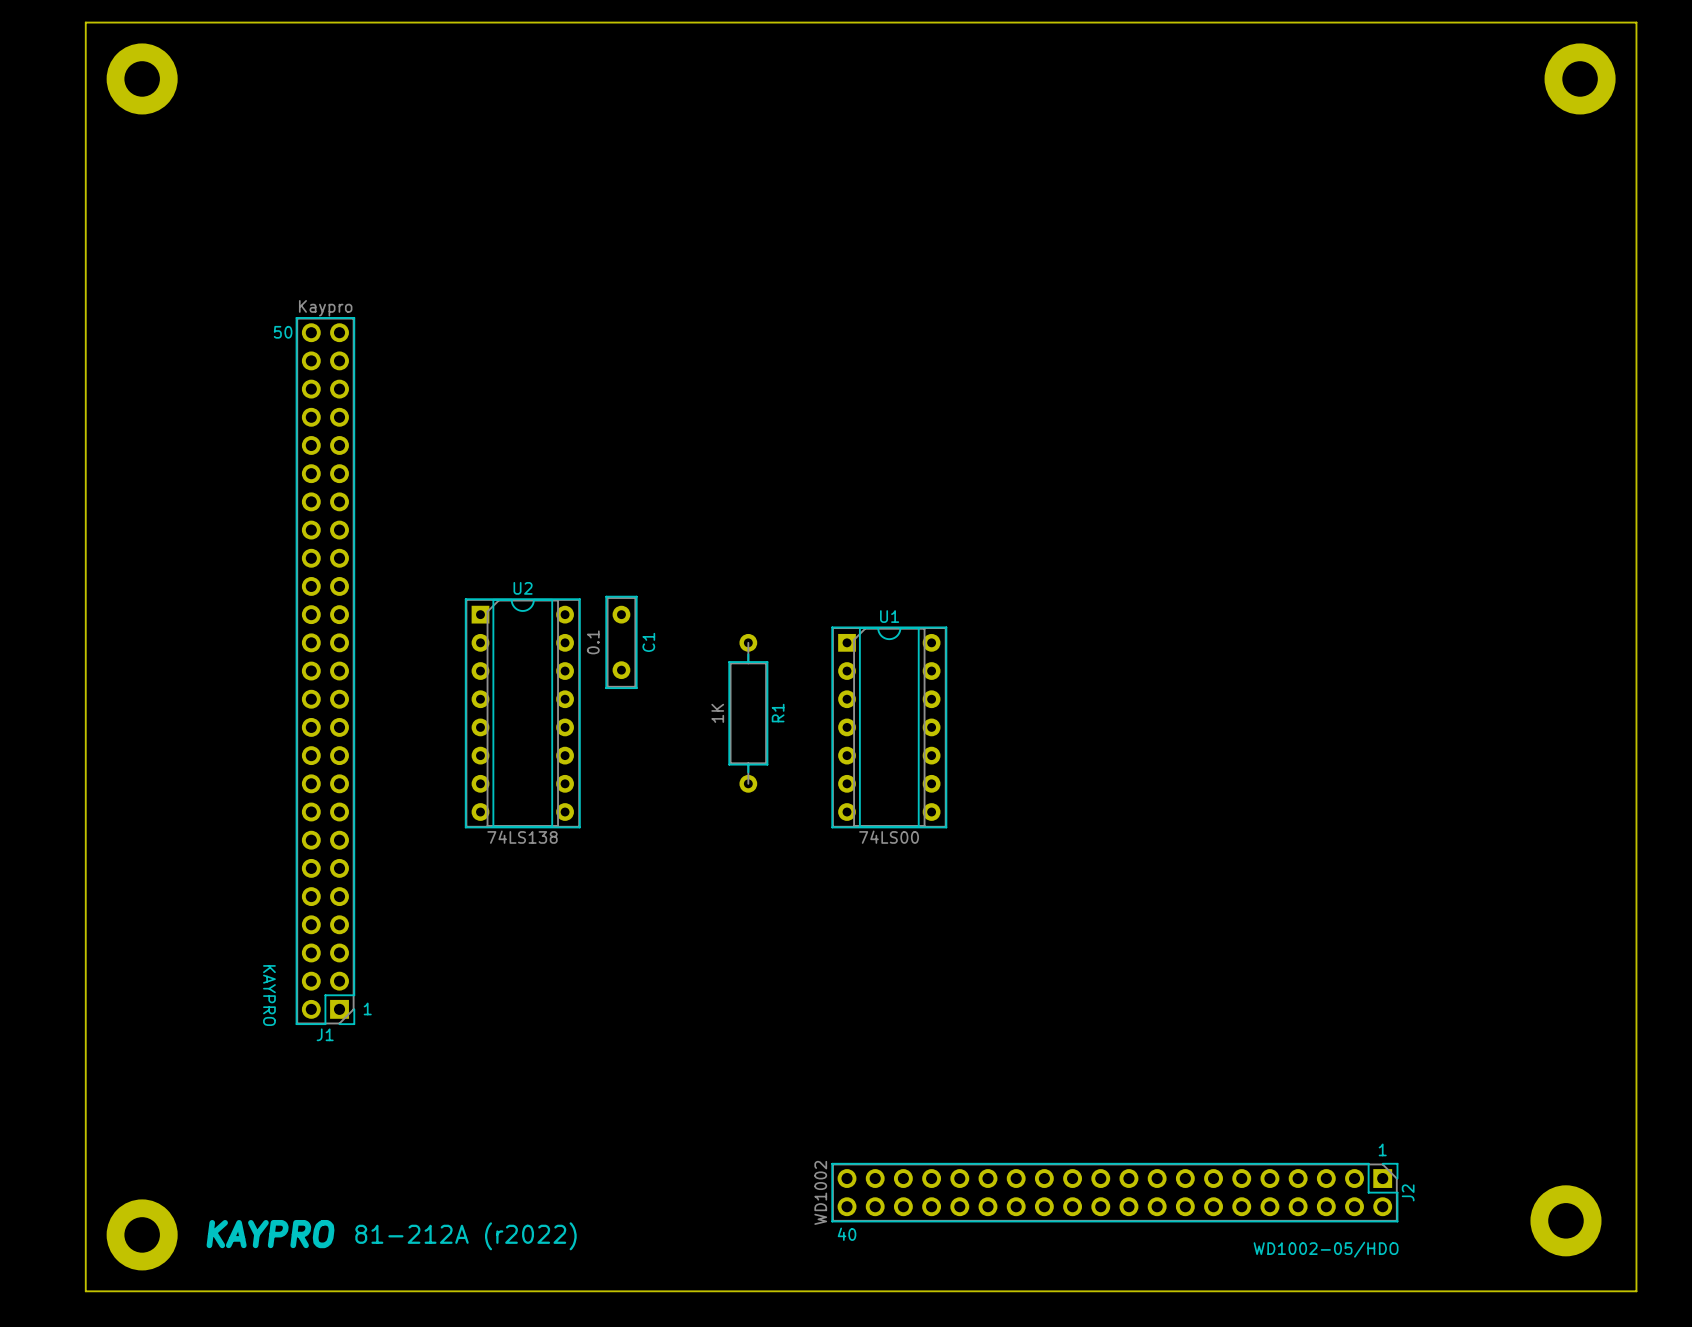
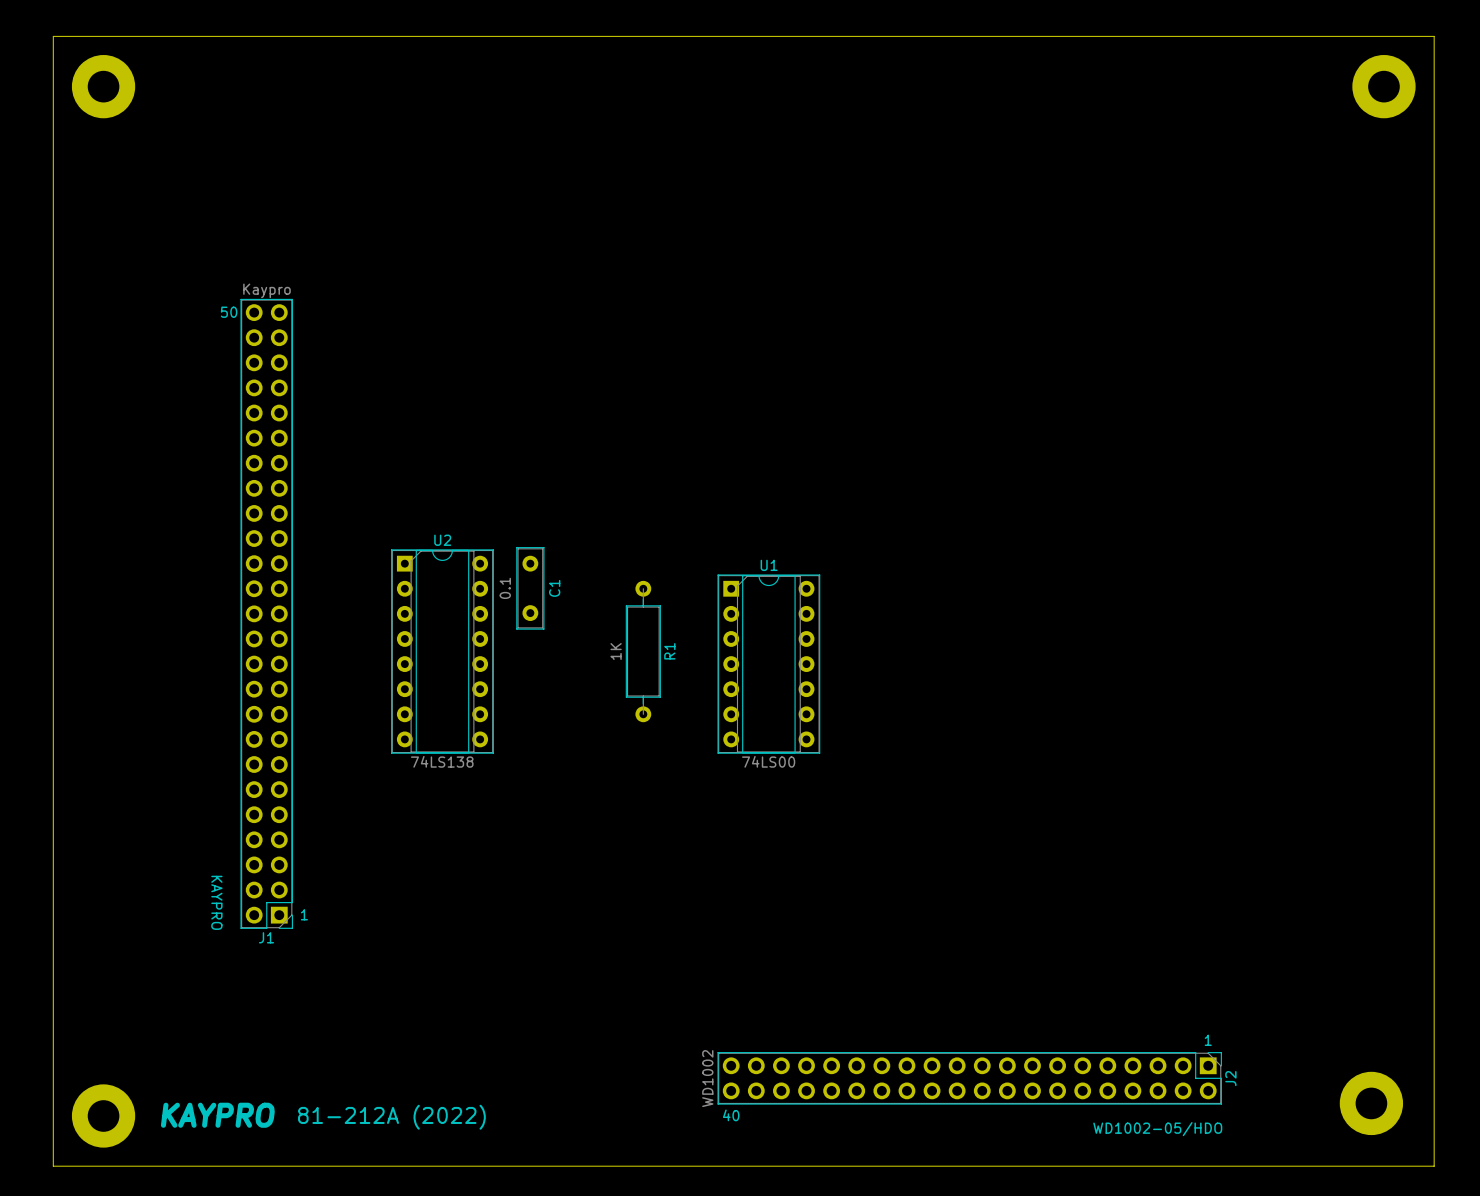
text: 81-212A (r2022) (465, 1236) -> 81-212A (2022) (391, 1117)

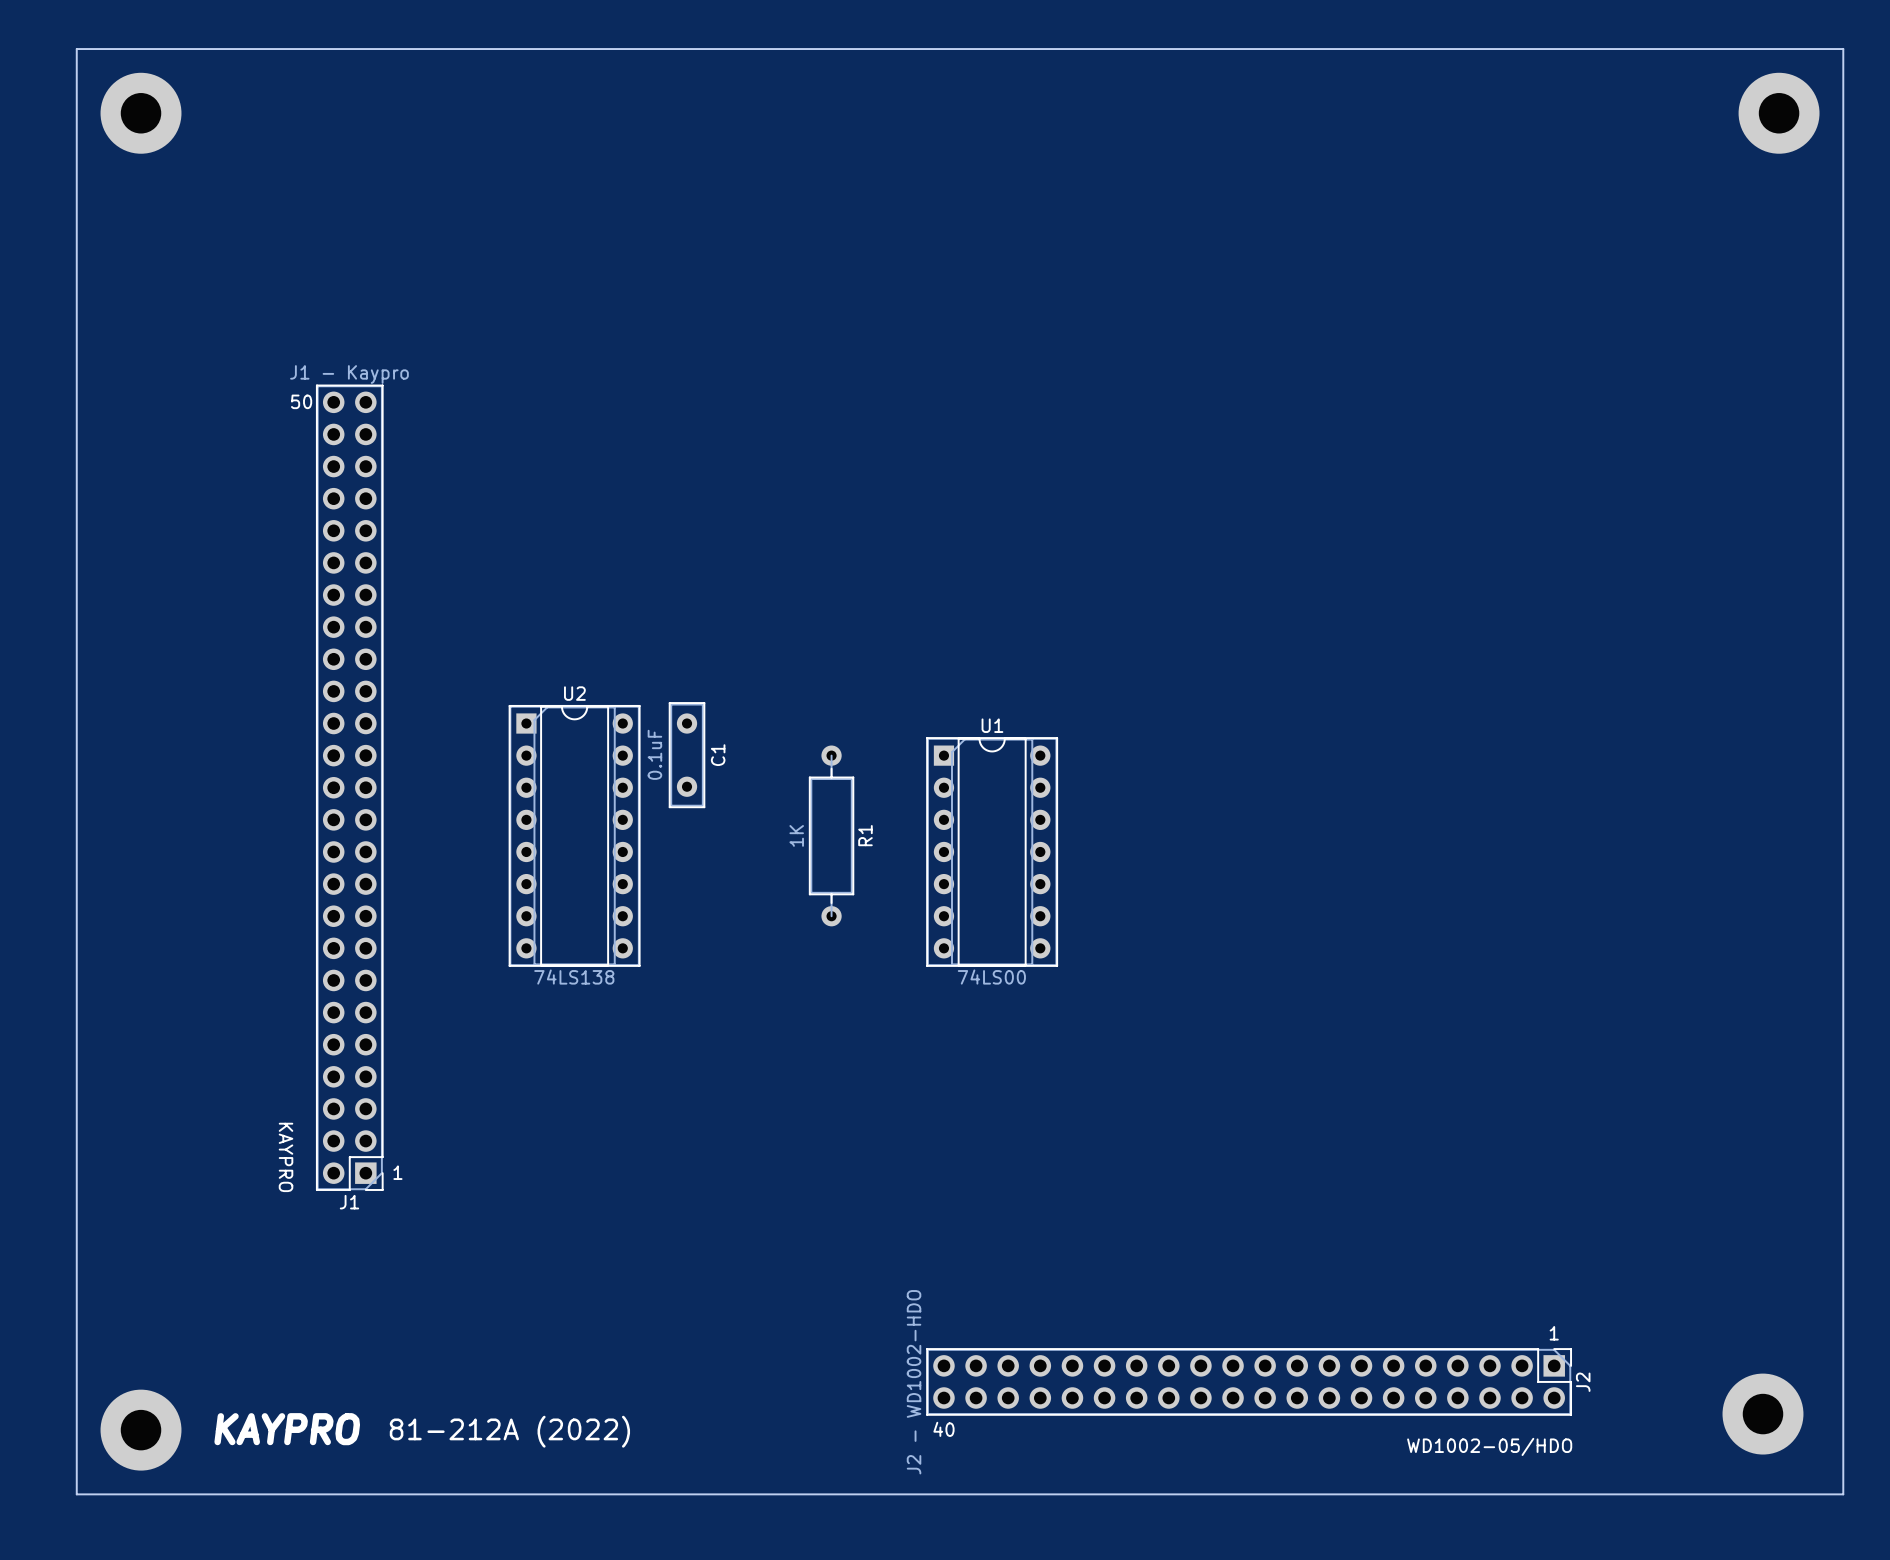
J1 value: Kaypro (266, 290) -> J1 - Kaypro (349, 374)
C1 value: 0.1 (505, 588) -> 0.1uF (654, 754)
J2 value: WD1002 (707, 1078) -> J2 - WD1002-HDO (914, 1382)

